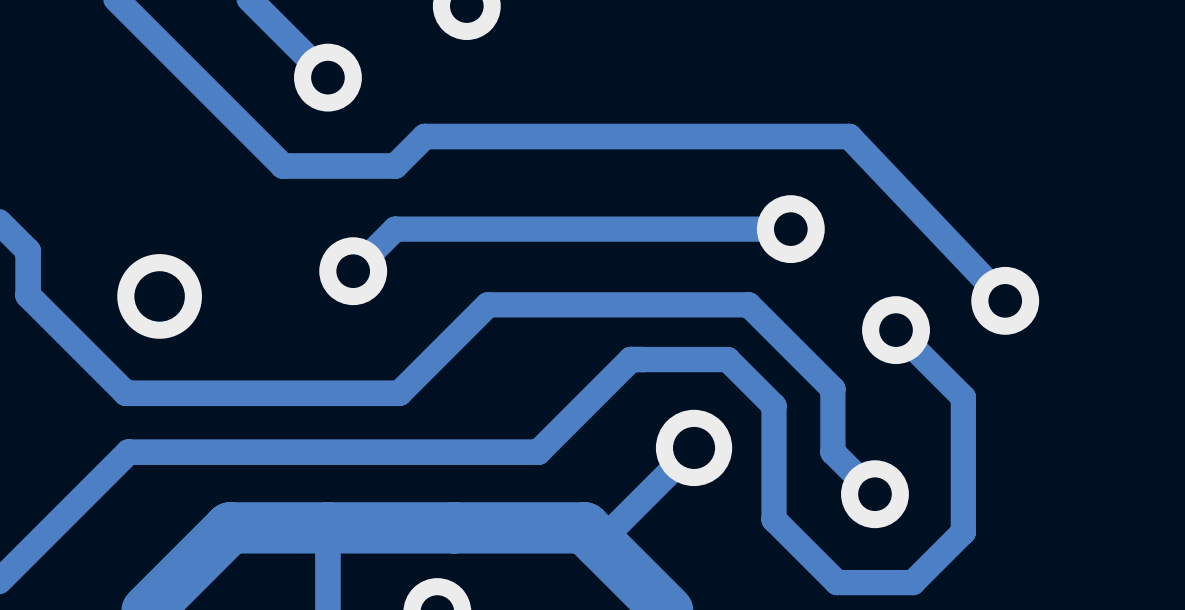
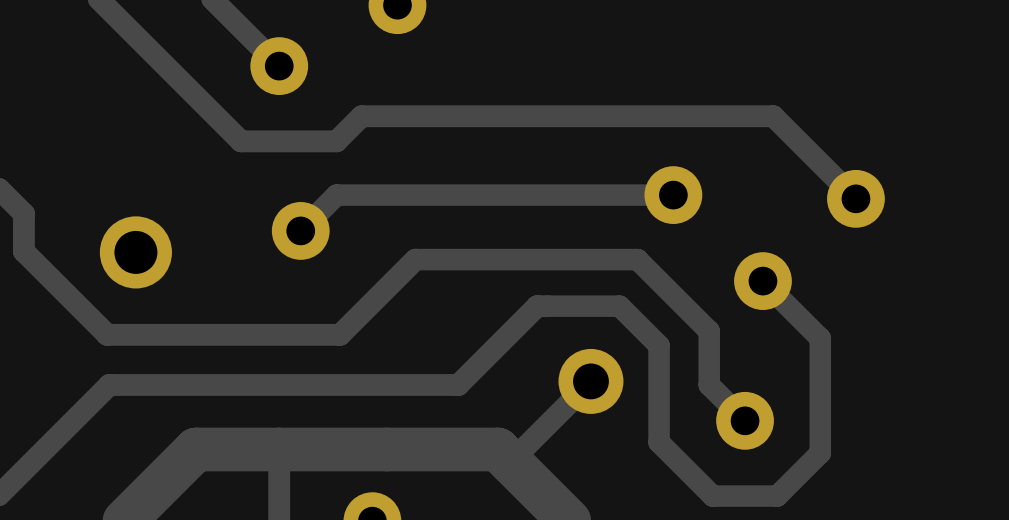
track: (849, 136) (1005, 300) -> (723, 116) (773, 116) (855, 198)
via position: (1005, 300) -> (855, 198)

